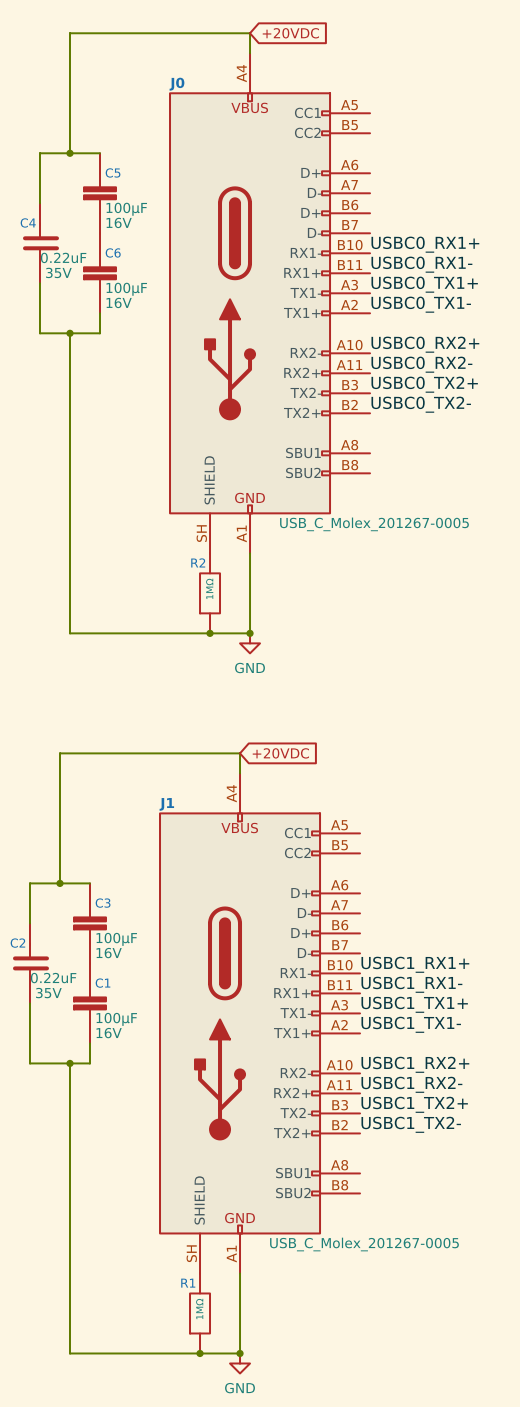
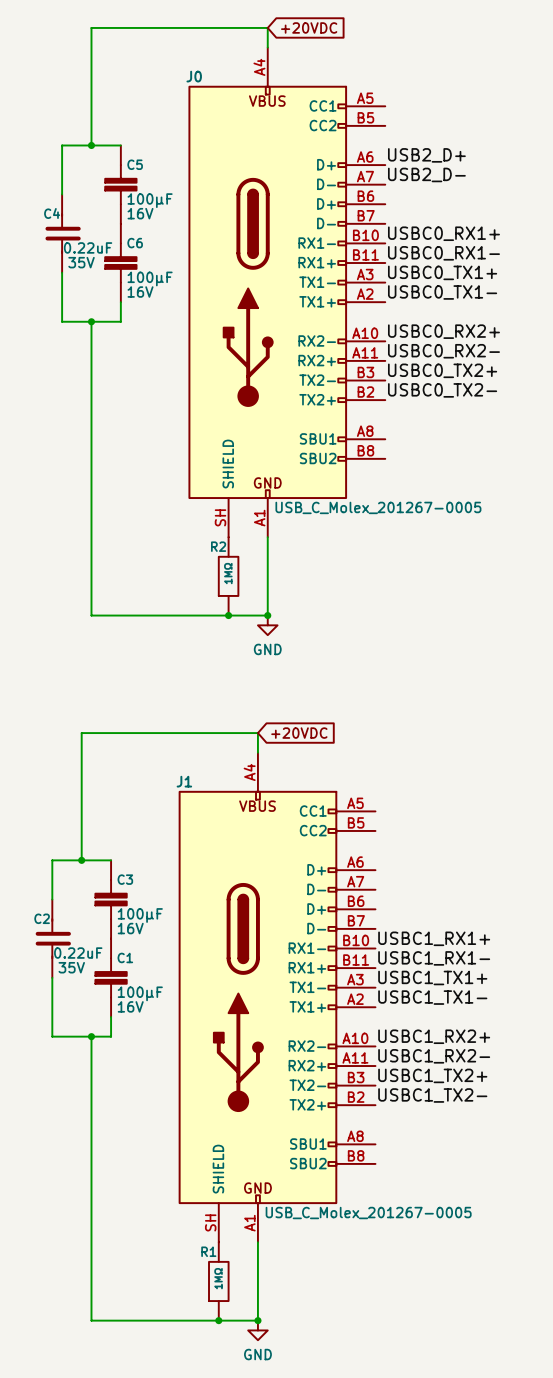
label: none -> USB2_D+ (426, 155)
label: none -> USB2_D- (426, 174)

